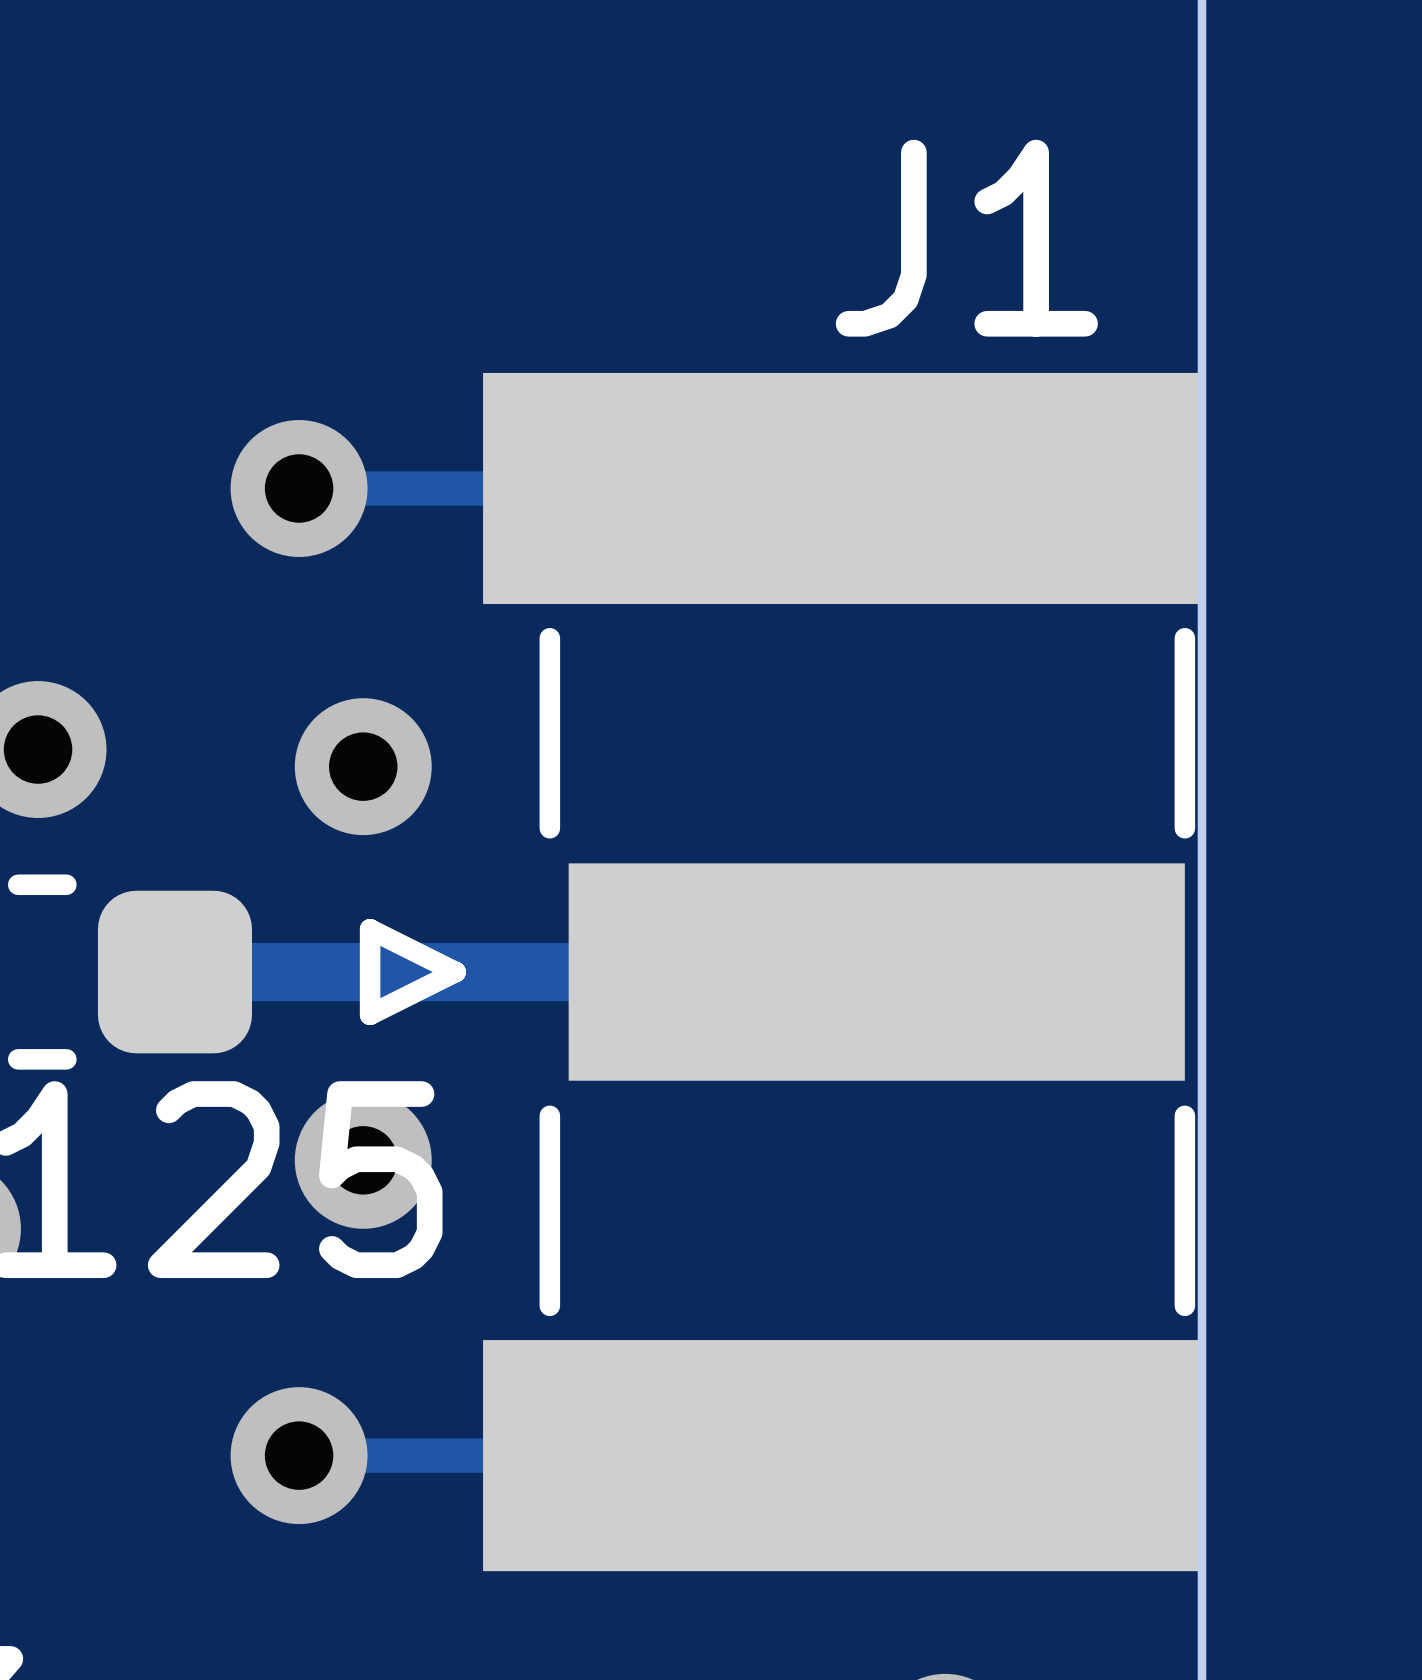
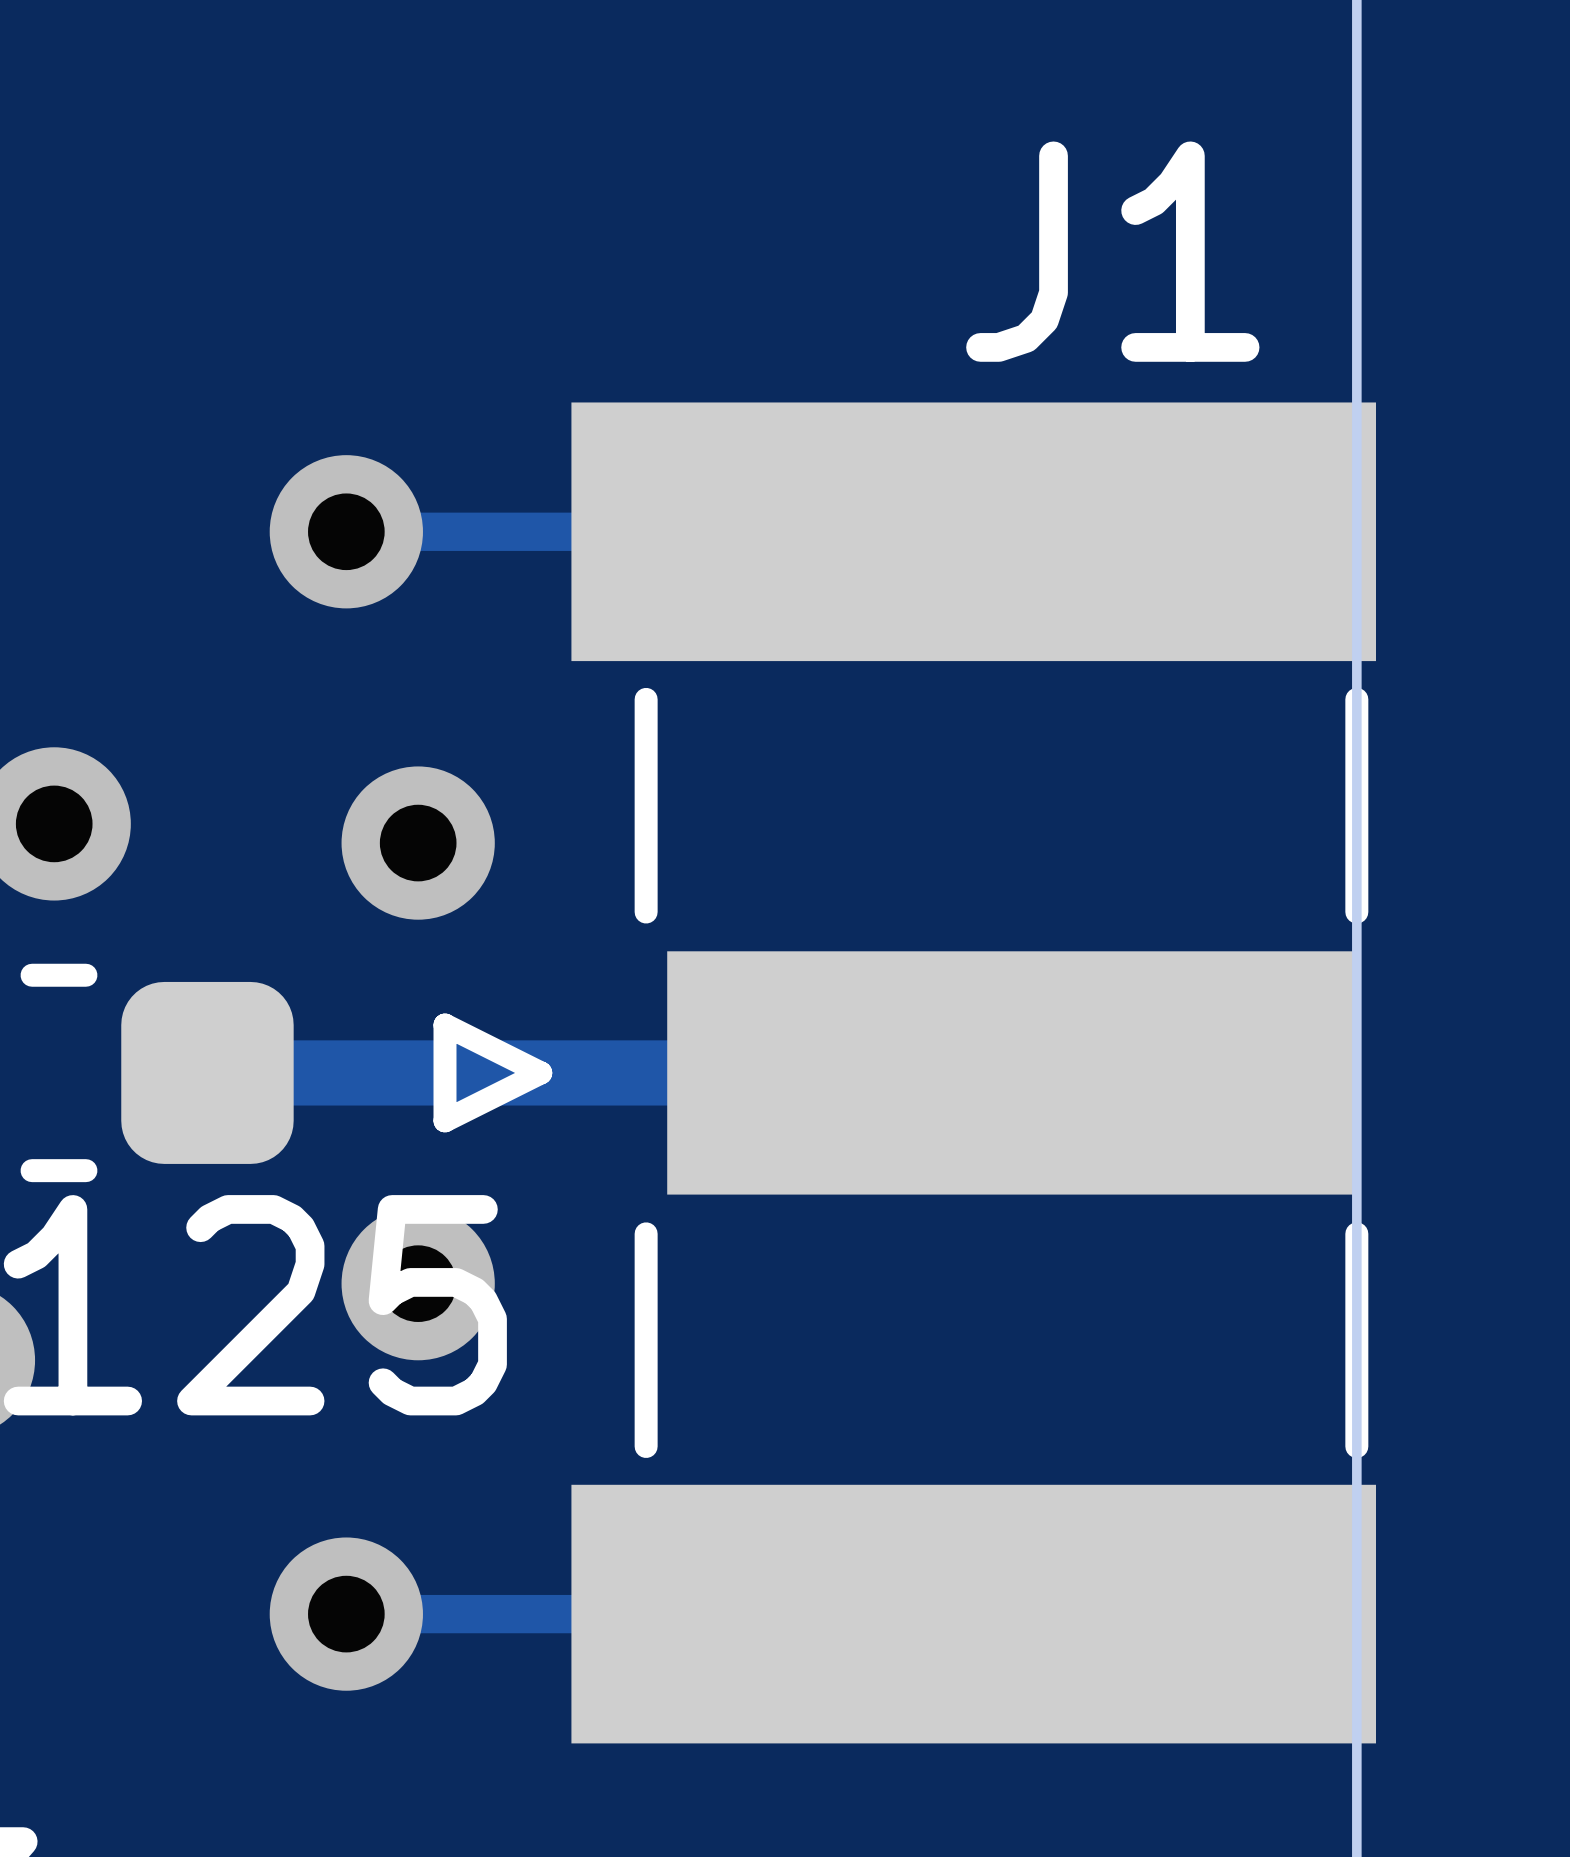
J1 position: (780, 972) -> (904, 1072)

